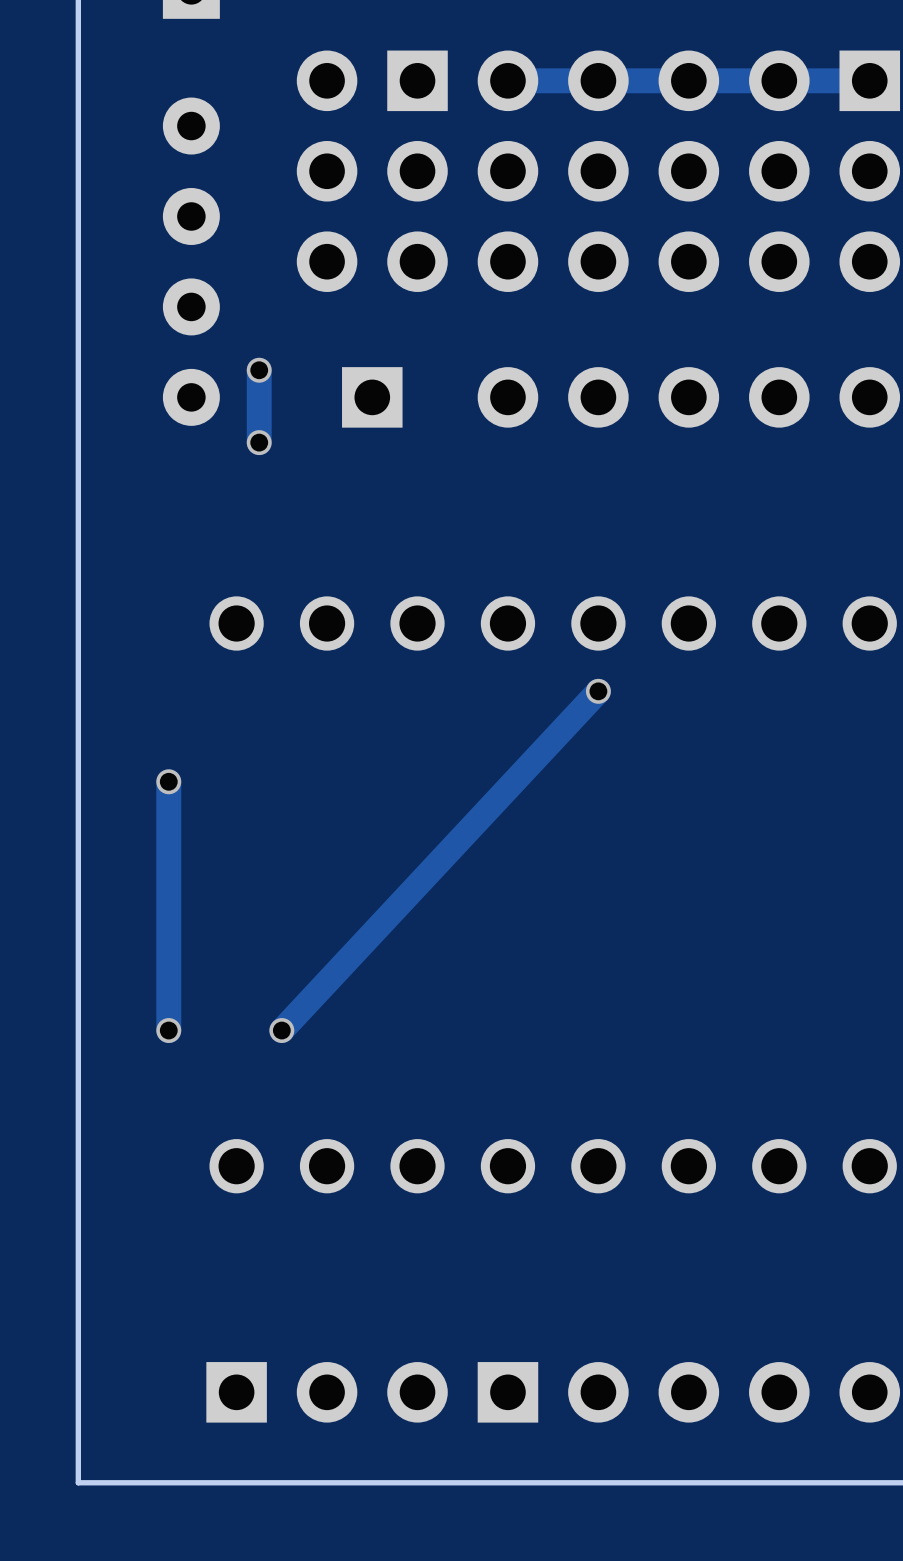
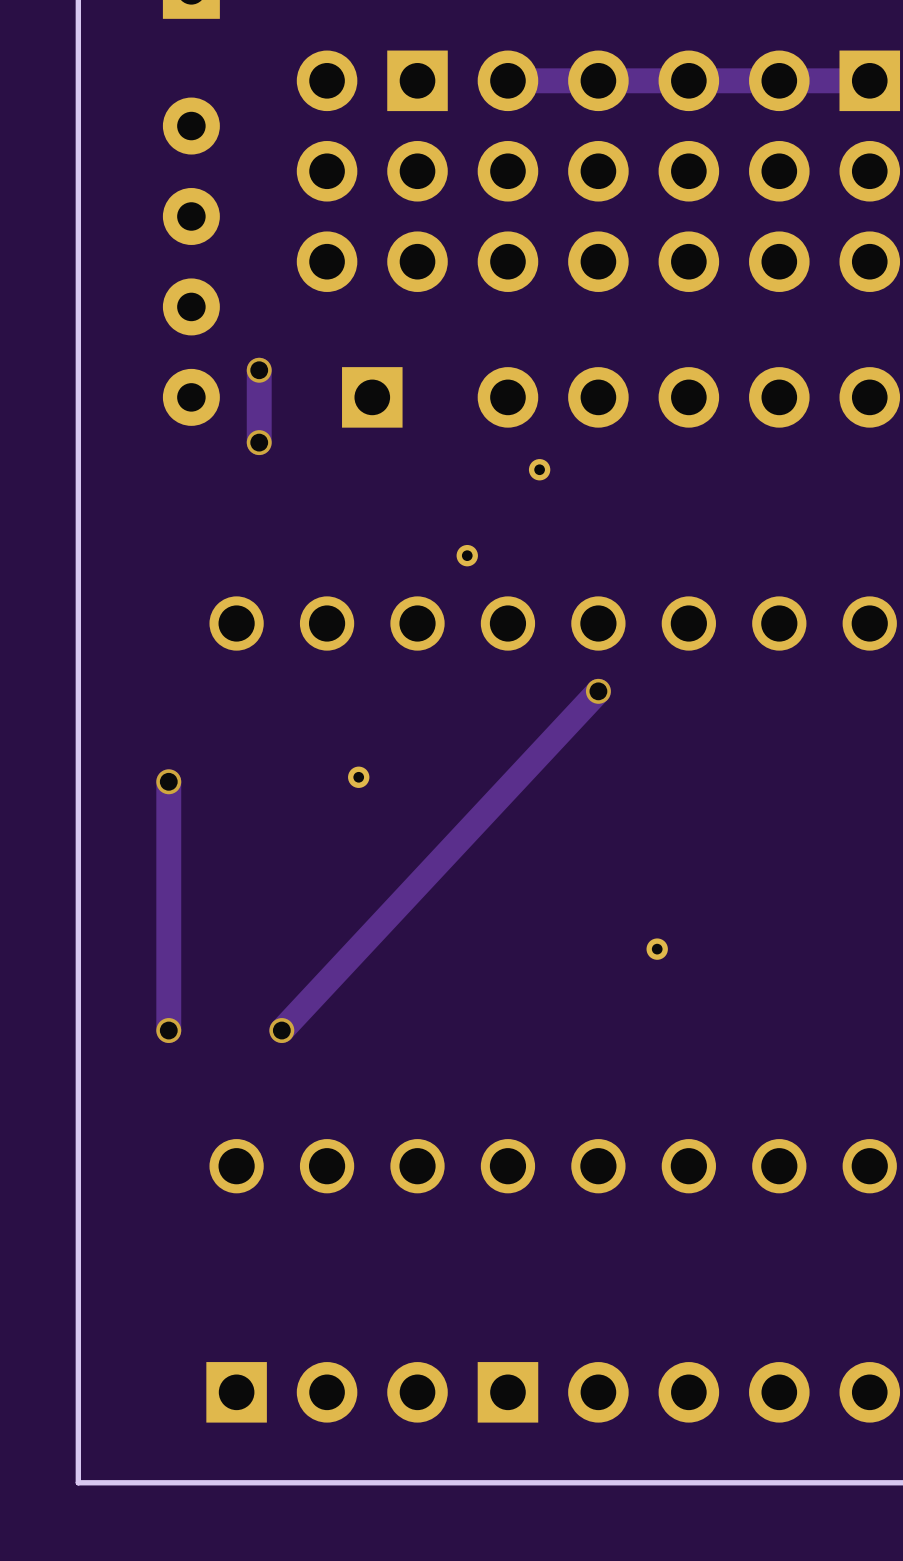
part: none -> (539, 469)
part: none -> (467, 555)
part: none -> (358, 777)
part: none -> (657, 949)

